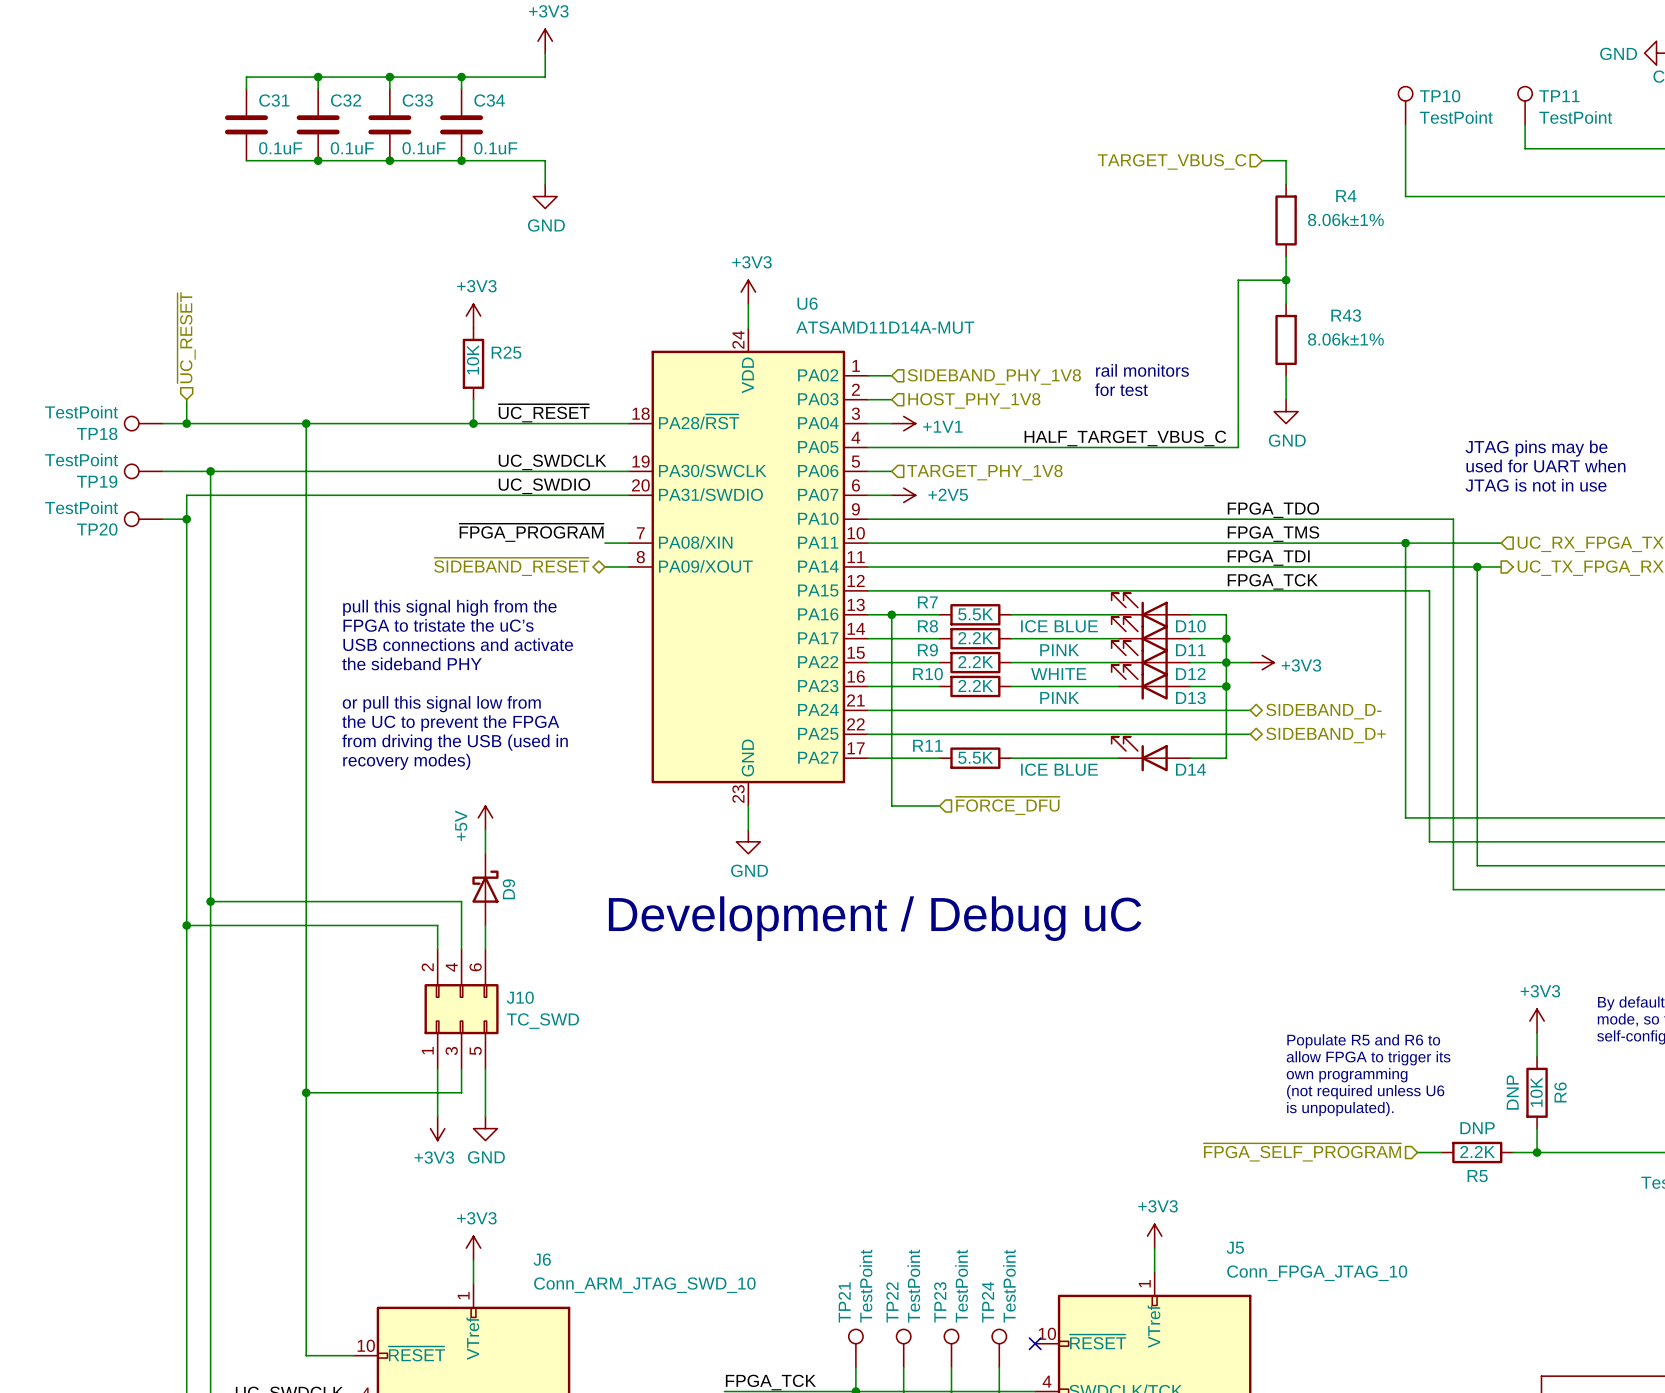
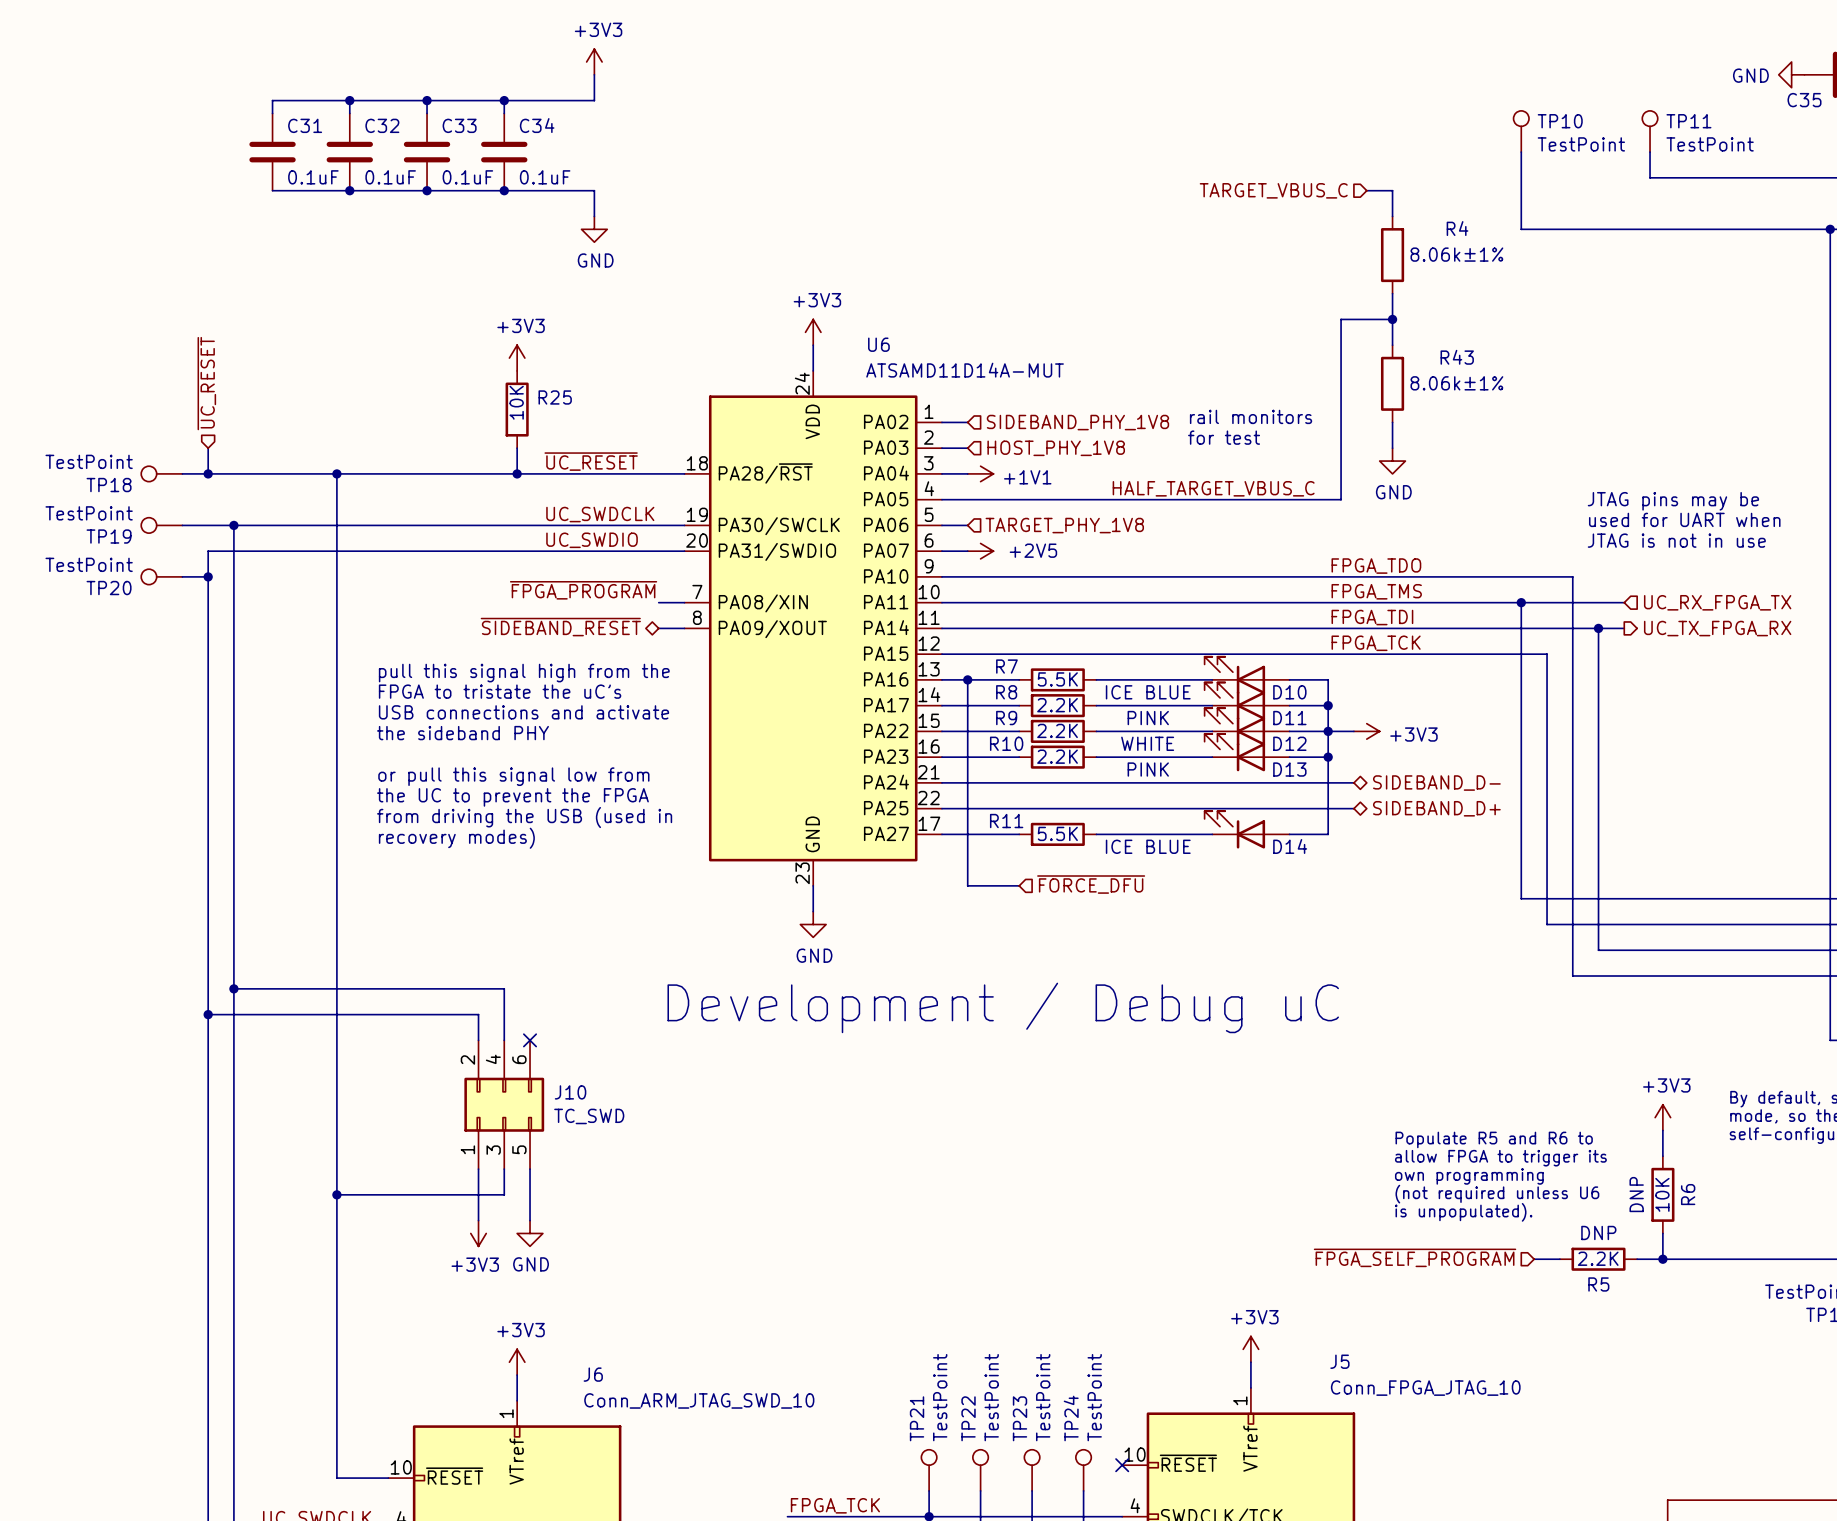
power symbol: +5V (485, 817) -> none
wire: (485, 829) (485, 853) -> none
D9: (485, 889) -> none
wire: (485, 925) (485, 949) -> none
no-connect mark: none -> (530, 1040)

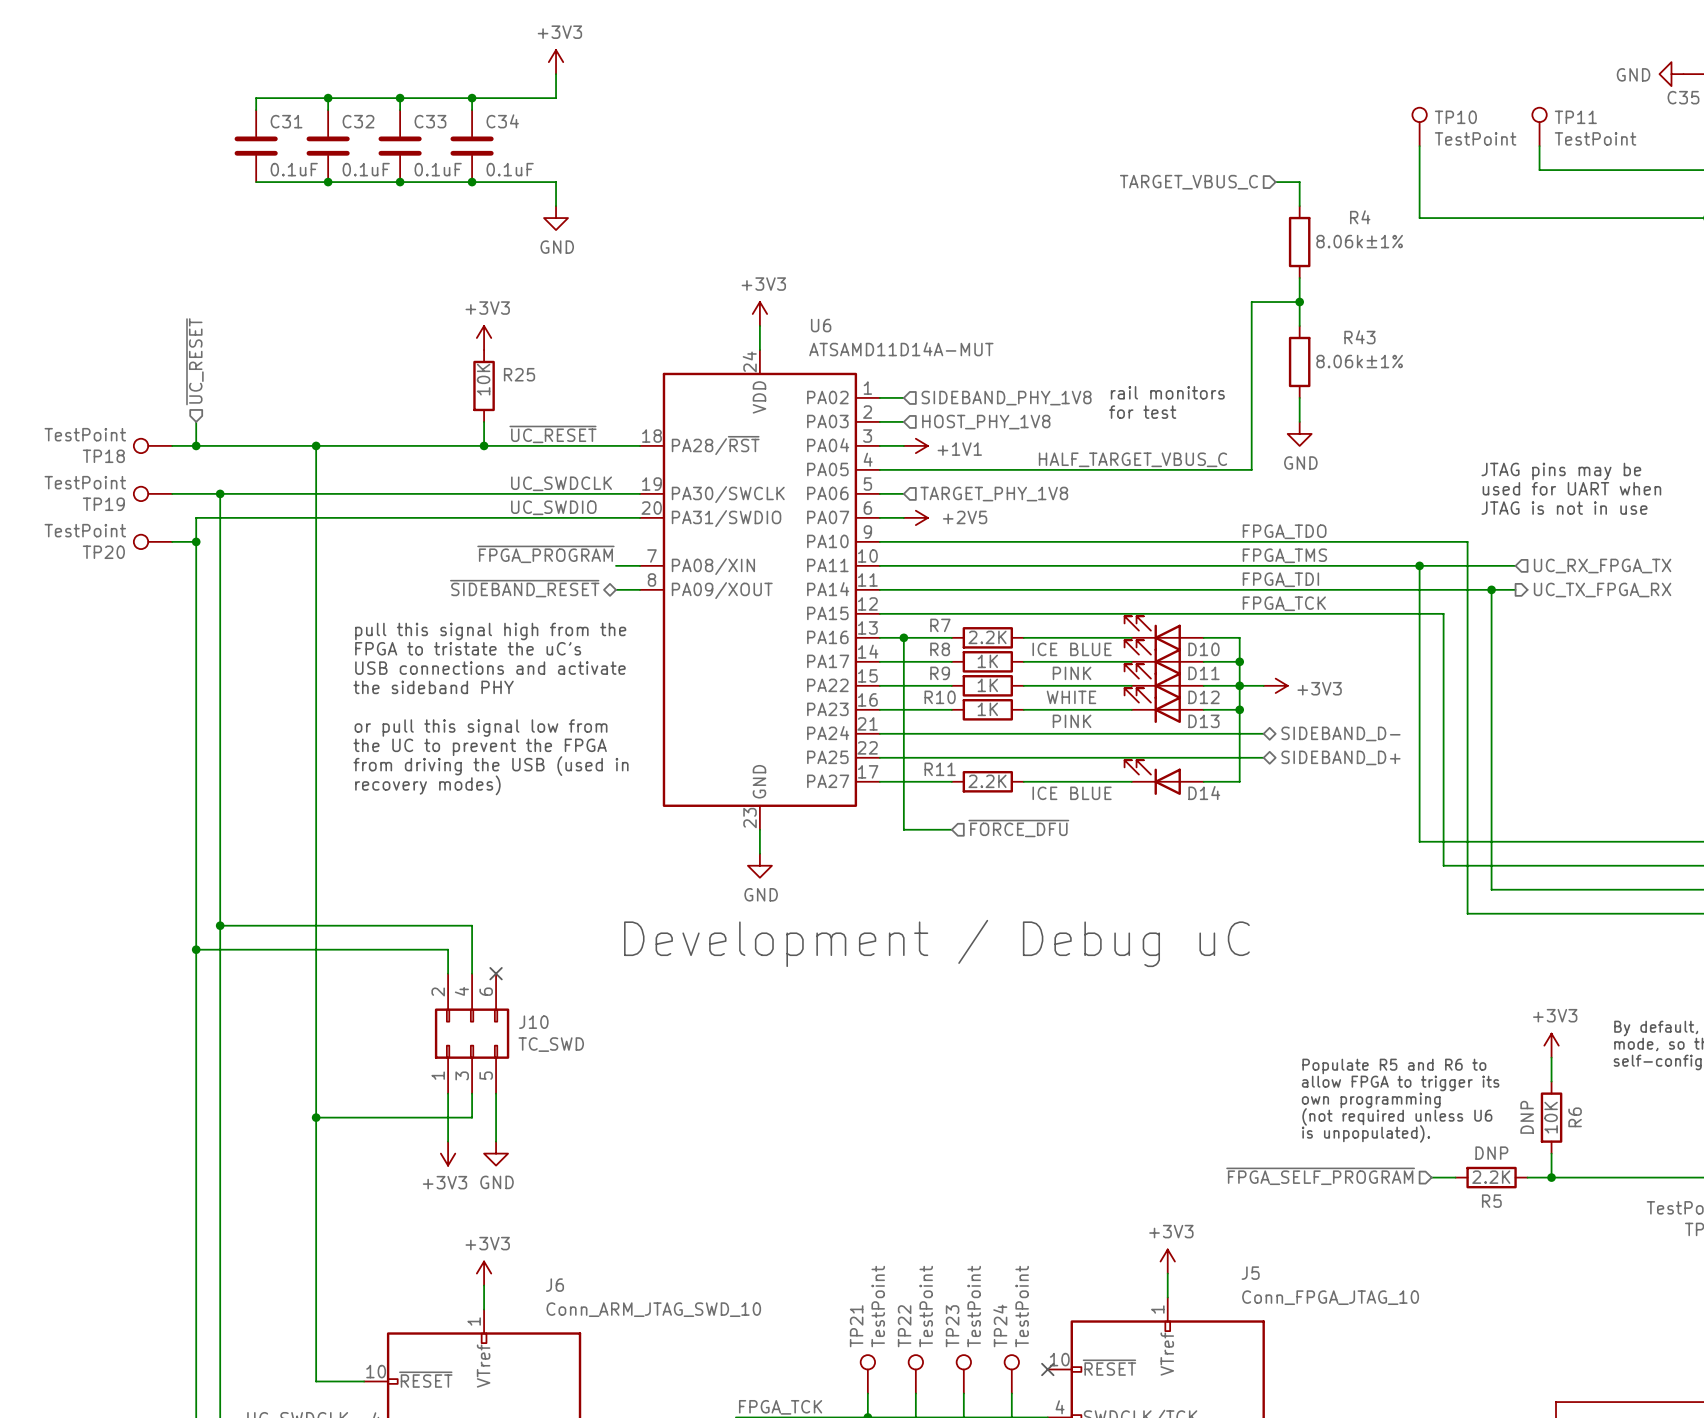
R7 value: 5.5K (1057, 679) -> 2.2K (987, 637)
R8 value: 2.2K (1057, 705) -> 1K (987, 661)
R9 value: 2.2K (1057, 730) -> 1K (987, 685)
R10 value: 2.2K (1057, 756) -> 1K (987, 709)
R11 value: 5.5K (1057, 833) -> 2.2K (987, 781)

